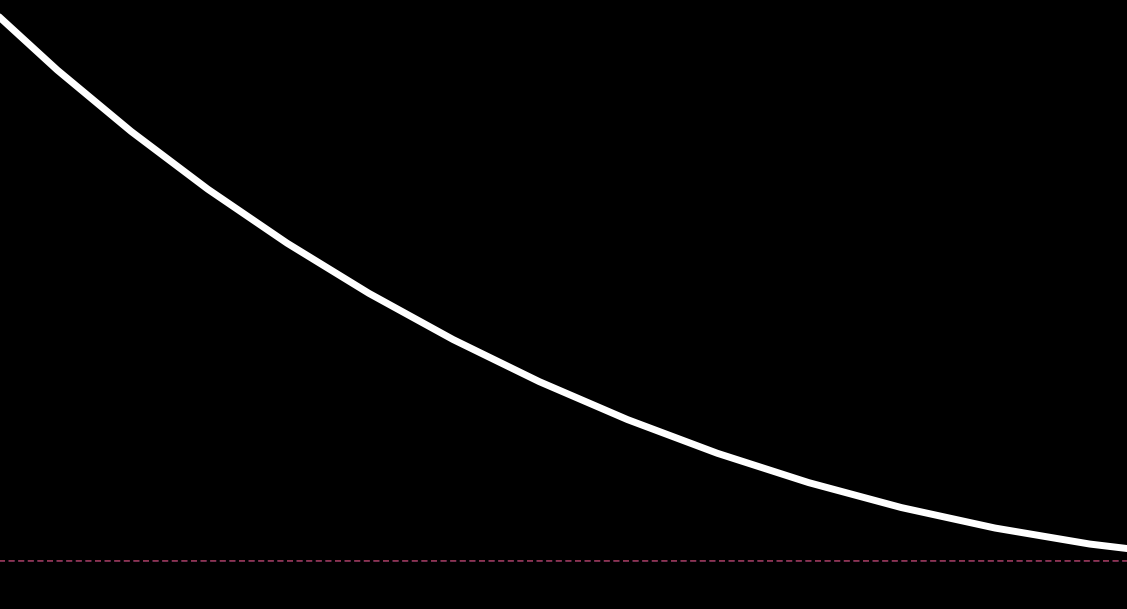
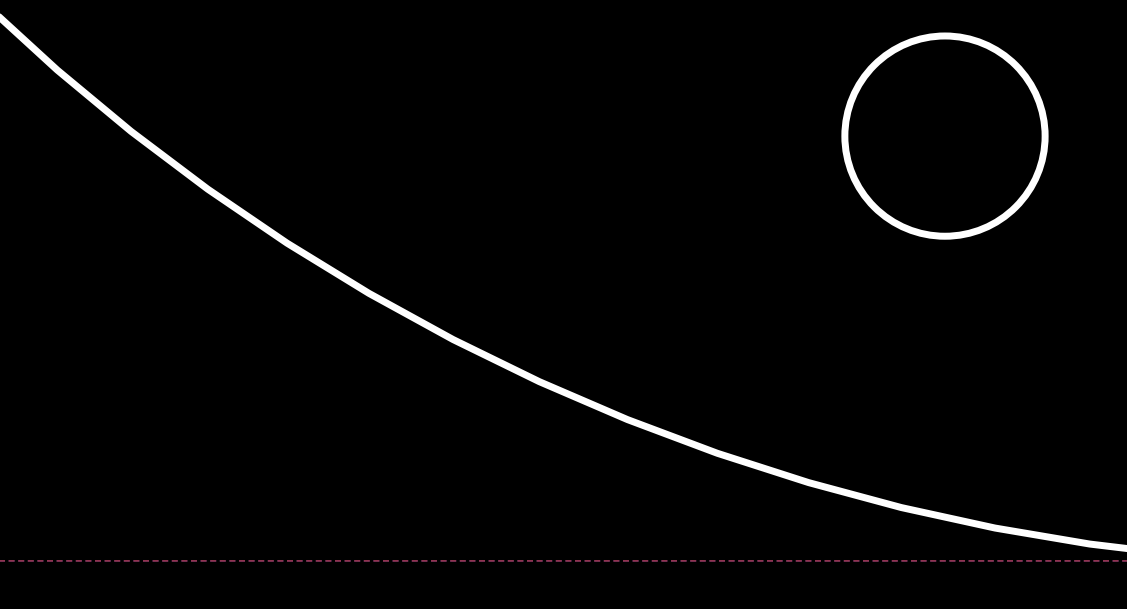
round board edge: none -> [841, 32, 1049, 240]

